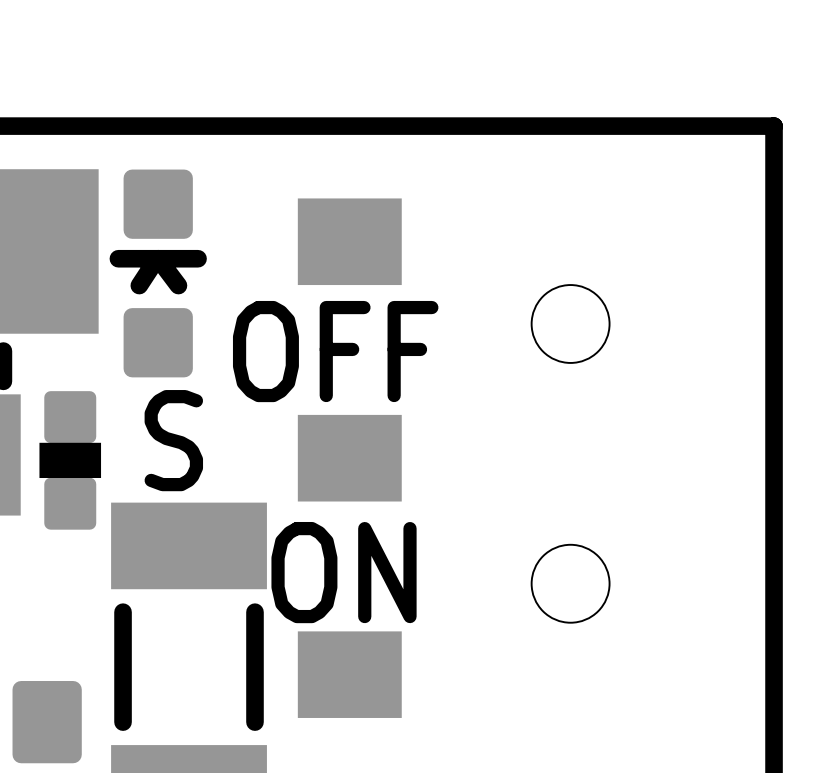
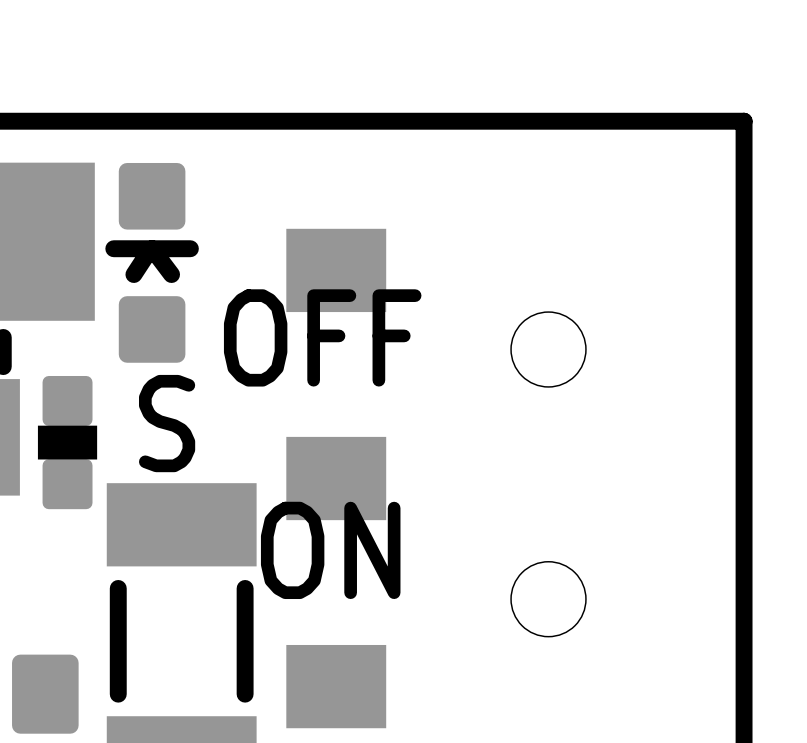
part position: (453, 458) -> (436, 478)

